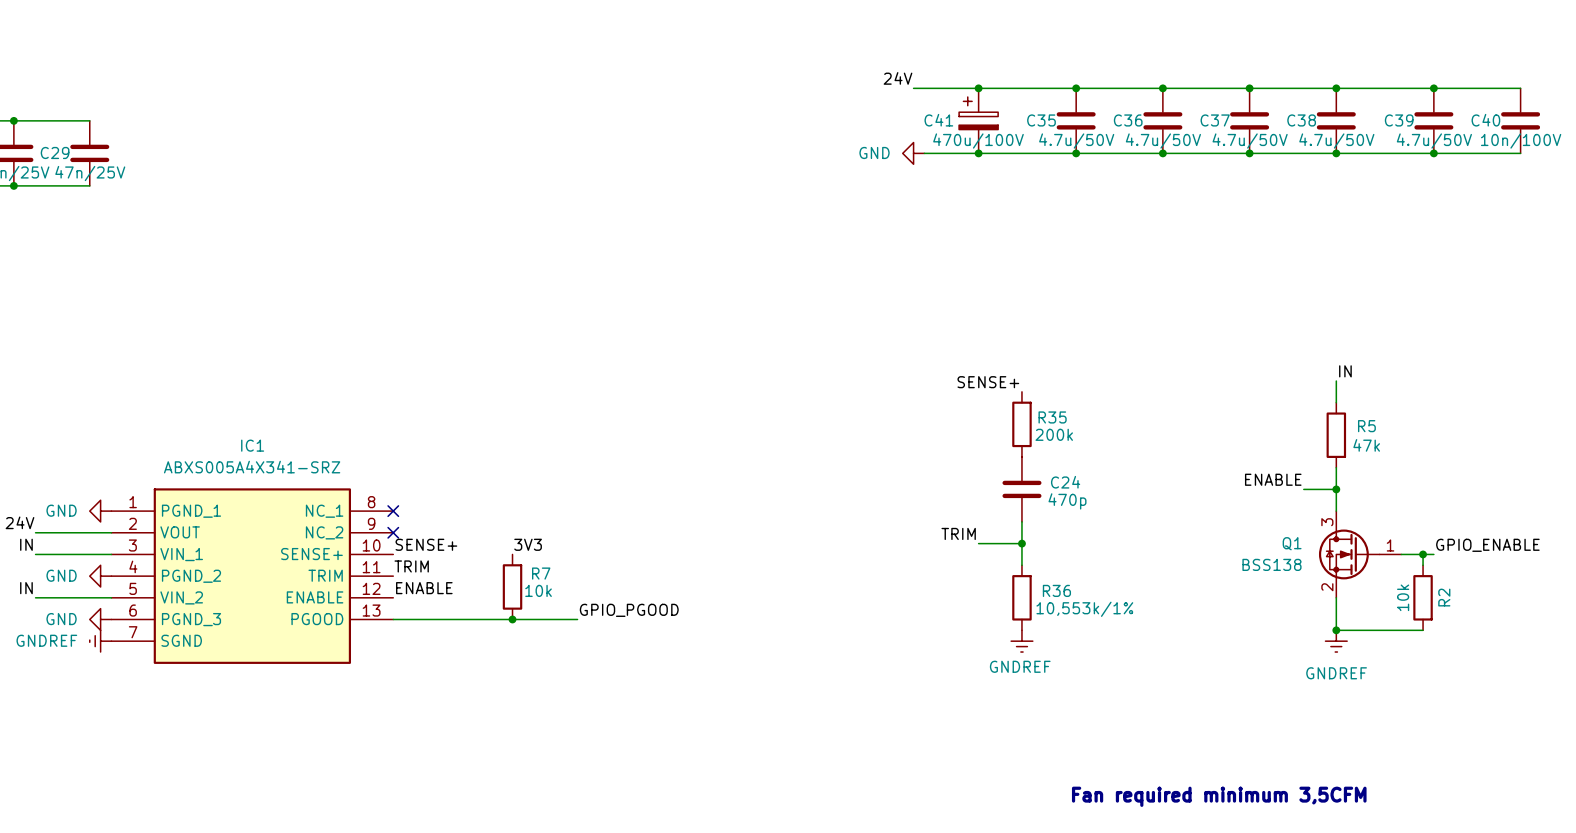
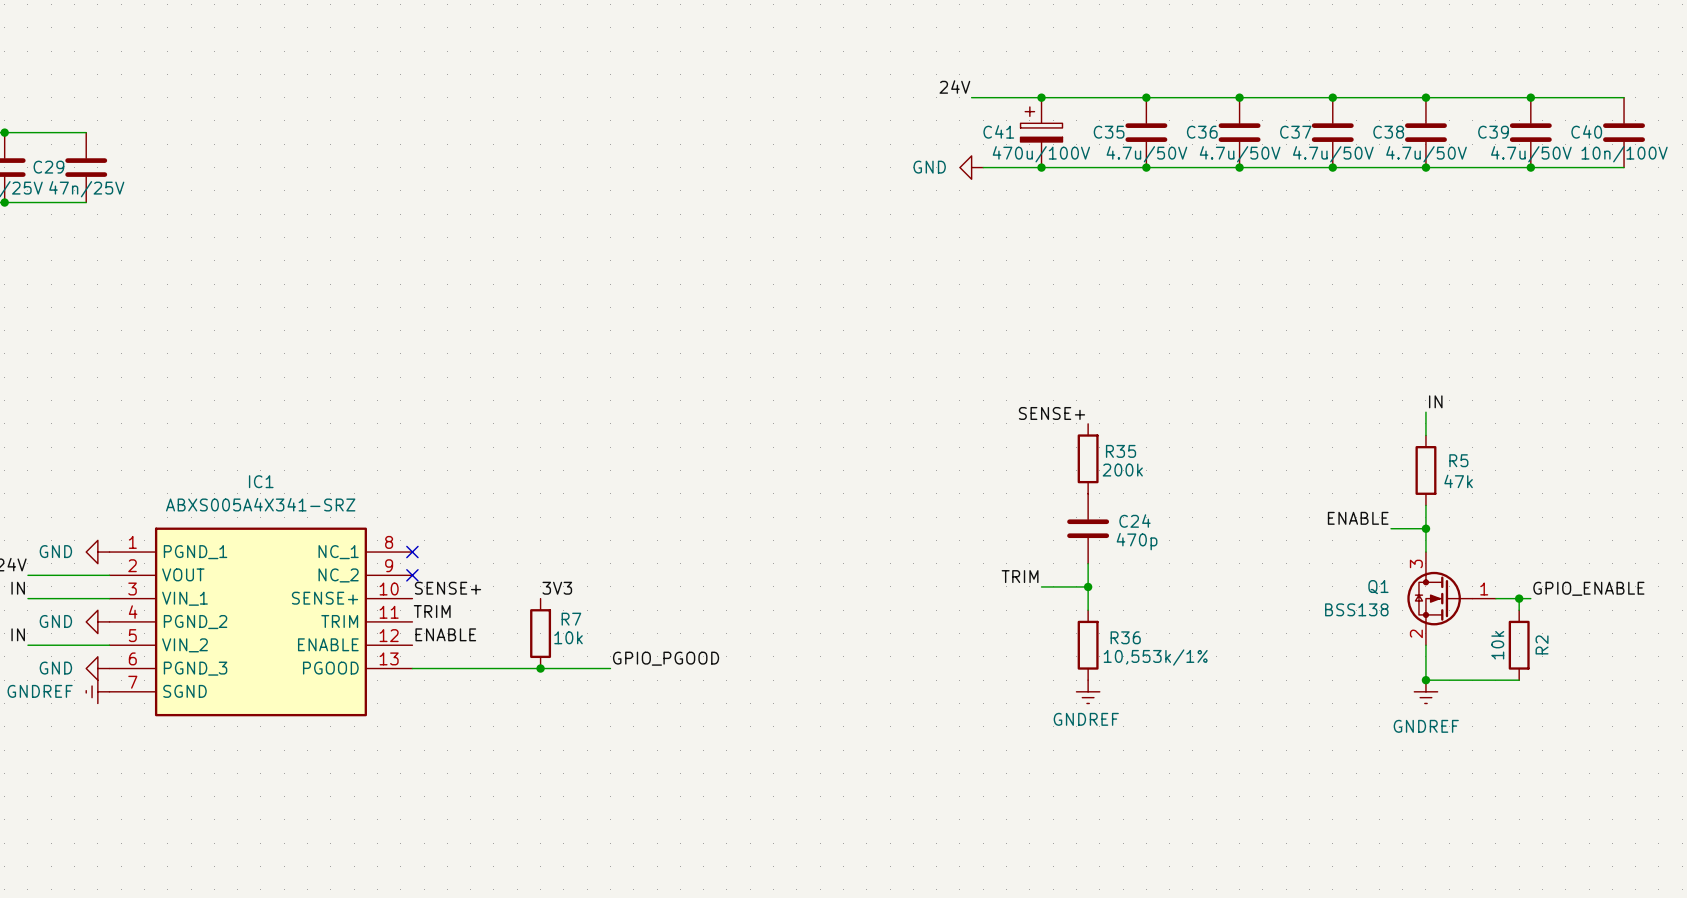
text: Fan required minimum 3,5CFM (1219, 796) -> none

